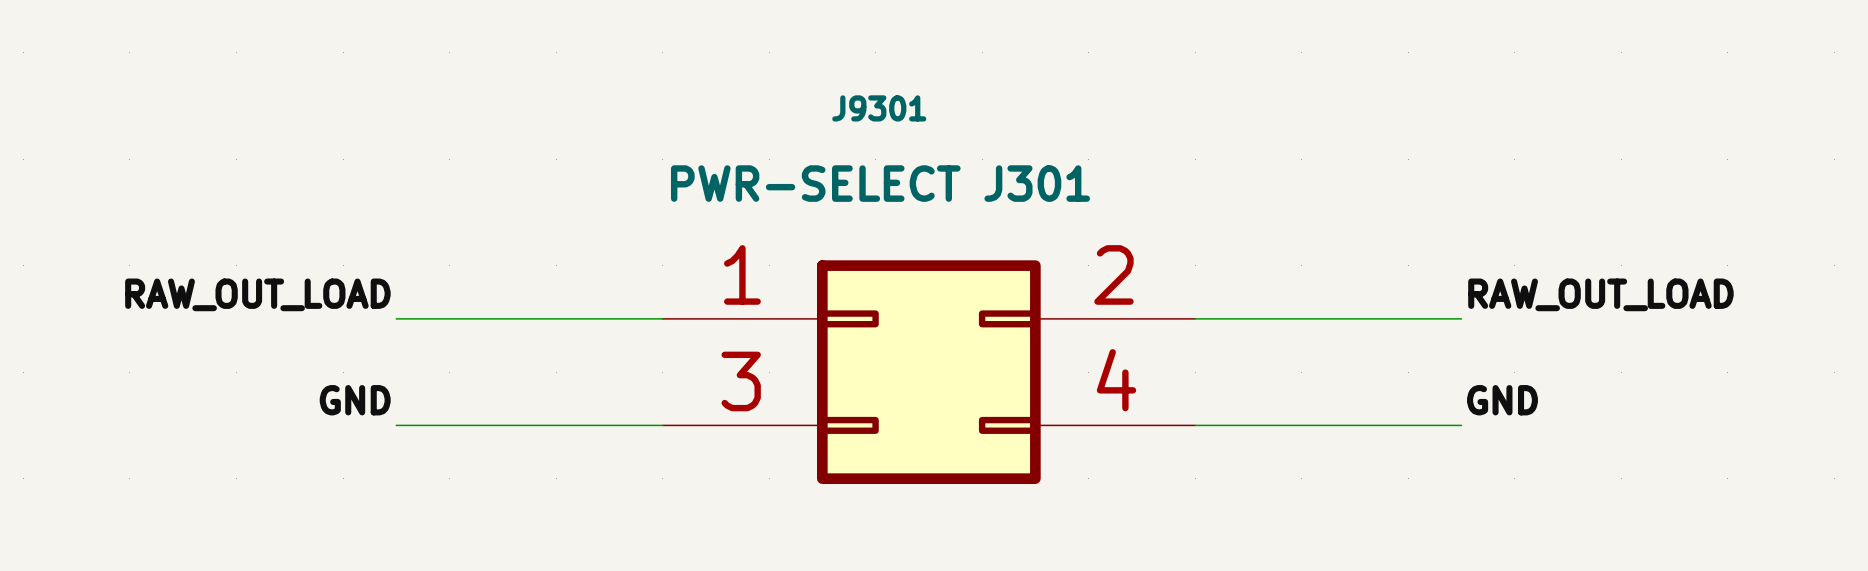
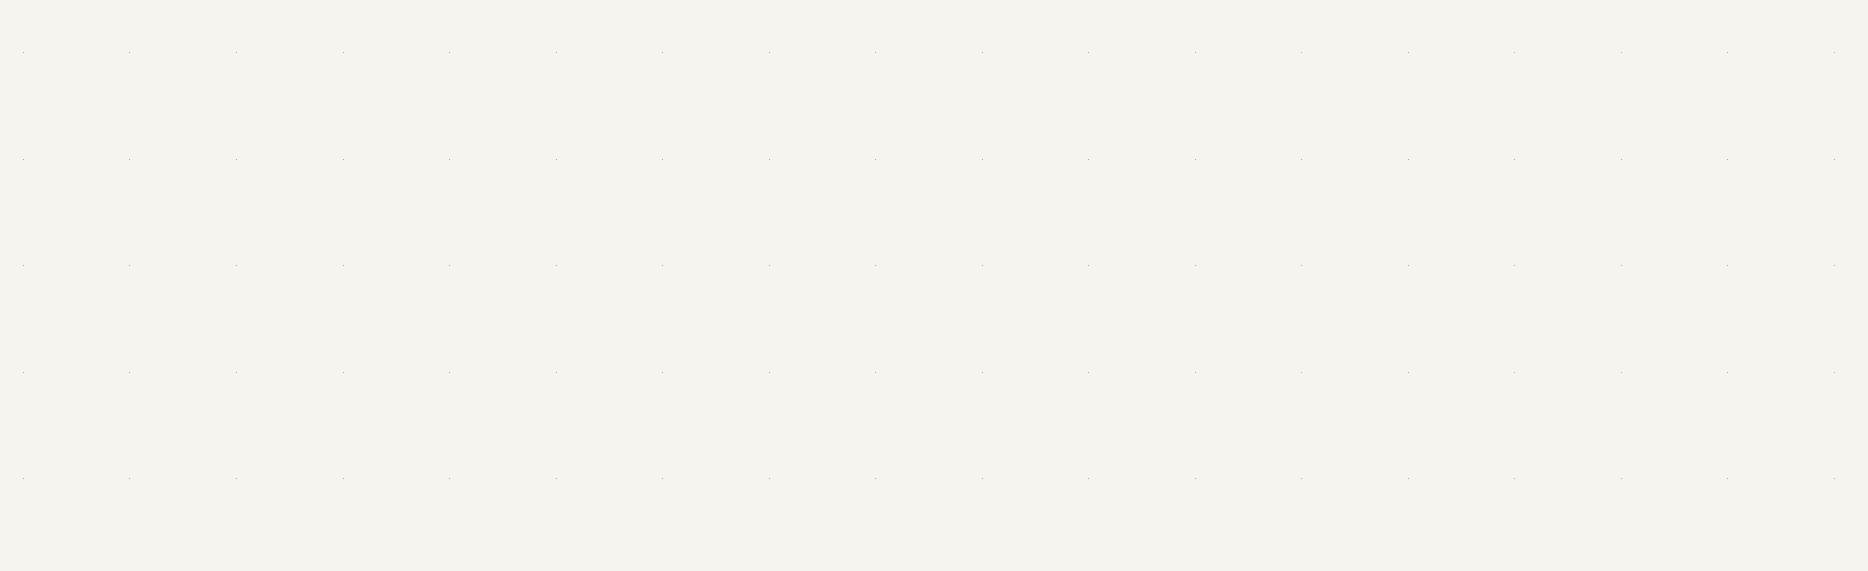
label: RAW_OUT_LOAD (257, 294) -> none
label: RAW_OUT_LOAD (1600, 294) -> none
wire: (396, 318) (662, 318) -> none
wire: (1195, 318) (1461, 318) -> none
J9301: PWR-SELECT J301 (928, 372) -> none
label: GND (355, 400) -> none
label: GND (1502, 400) -> none
wire: (396, 425) (662, 425) -> none
wire: (1195, 425) (1461, 425) -> none

